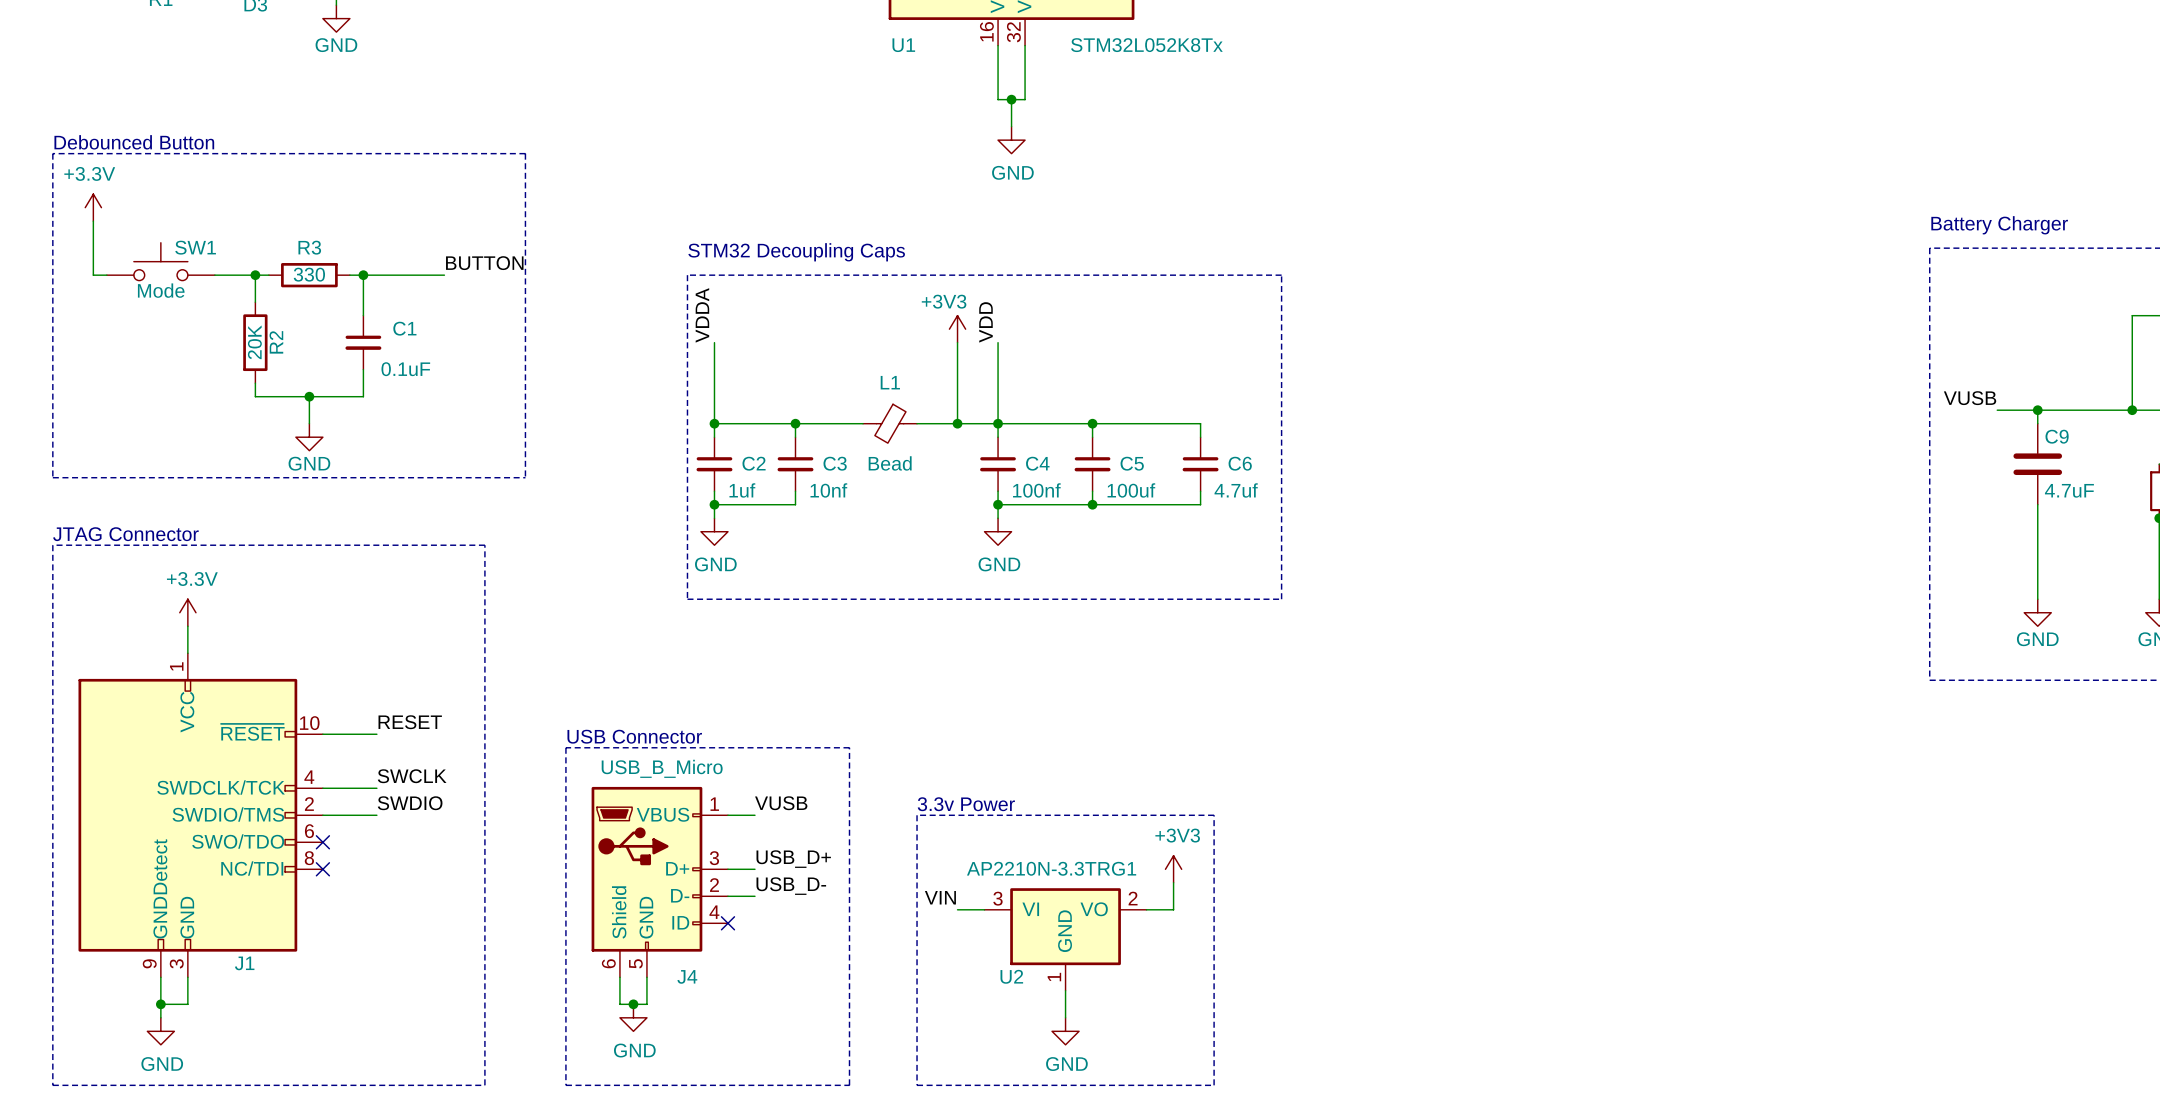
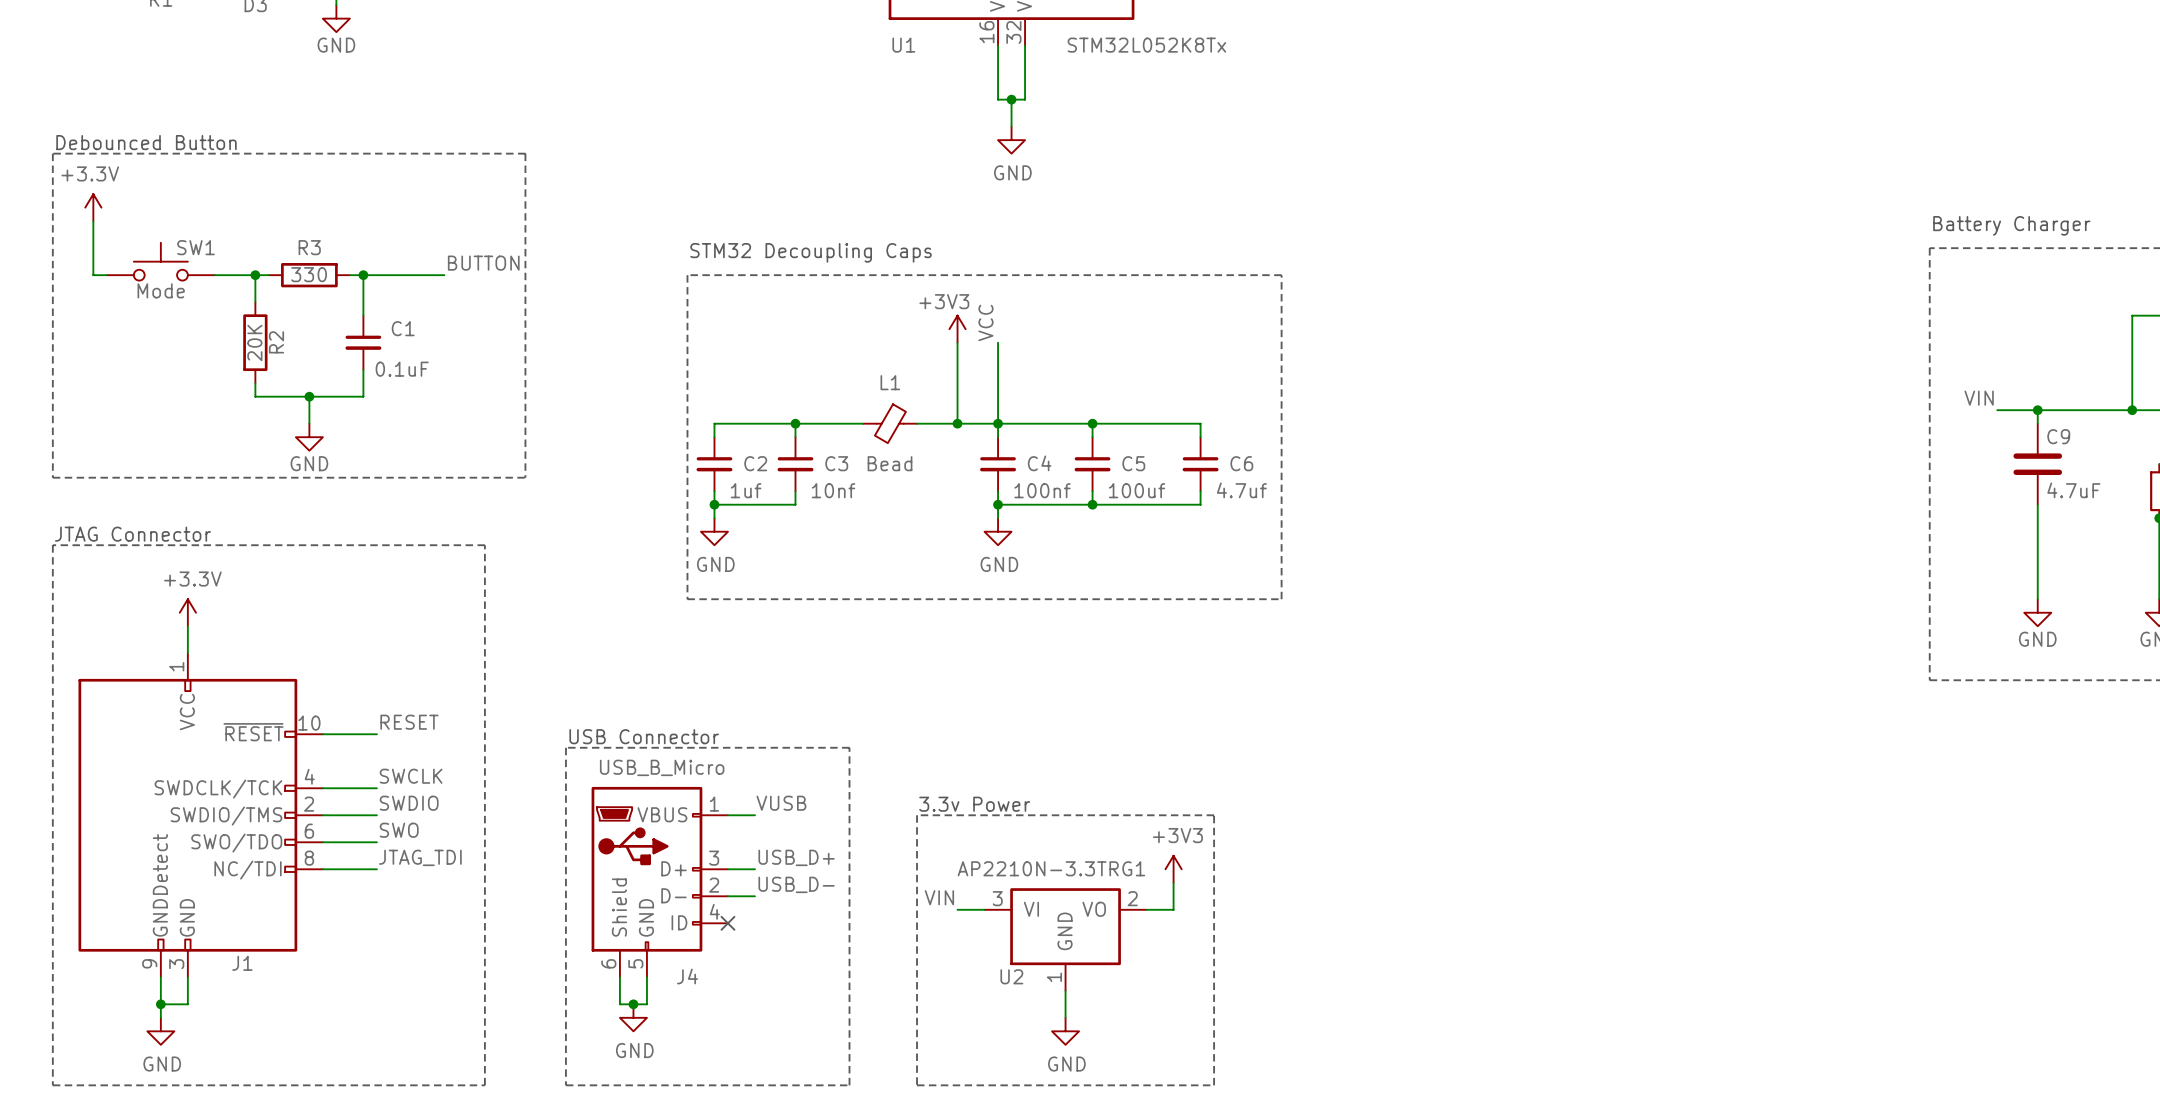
label: VDDA (702, 315) -> none
label: VDD (985, 322) -> VCC (985, 322)
wire: (714, 342) (714, 423) -> none
label: VUSB (1970, 398) -> VIN (1979, 398)
junction: (714, 423) -> none
label: none -> SWO (399, 830)
wire: none -> (322, 842) (376, 842)
no-connect mark: (322, 842) -> none
label: none -> JTAG_TDI (420, 857)
wire: none -> (322, 869) (376, 869)
no-connect mark: (322, 869) -> none

